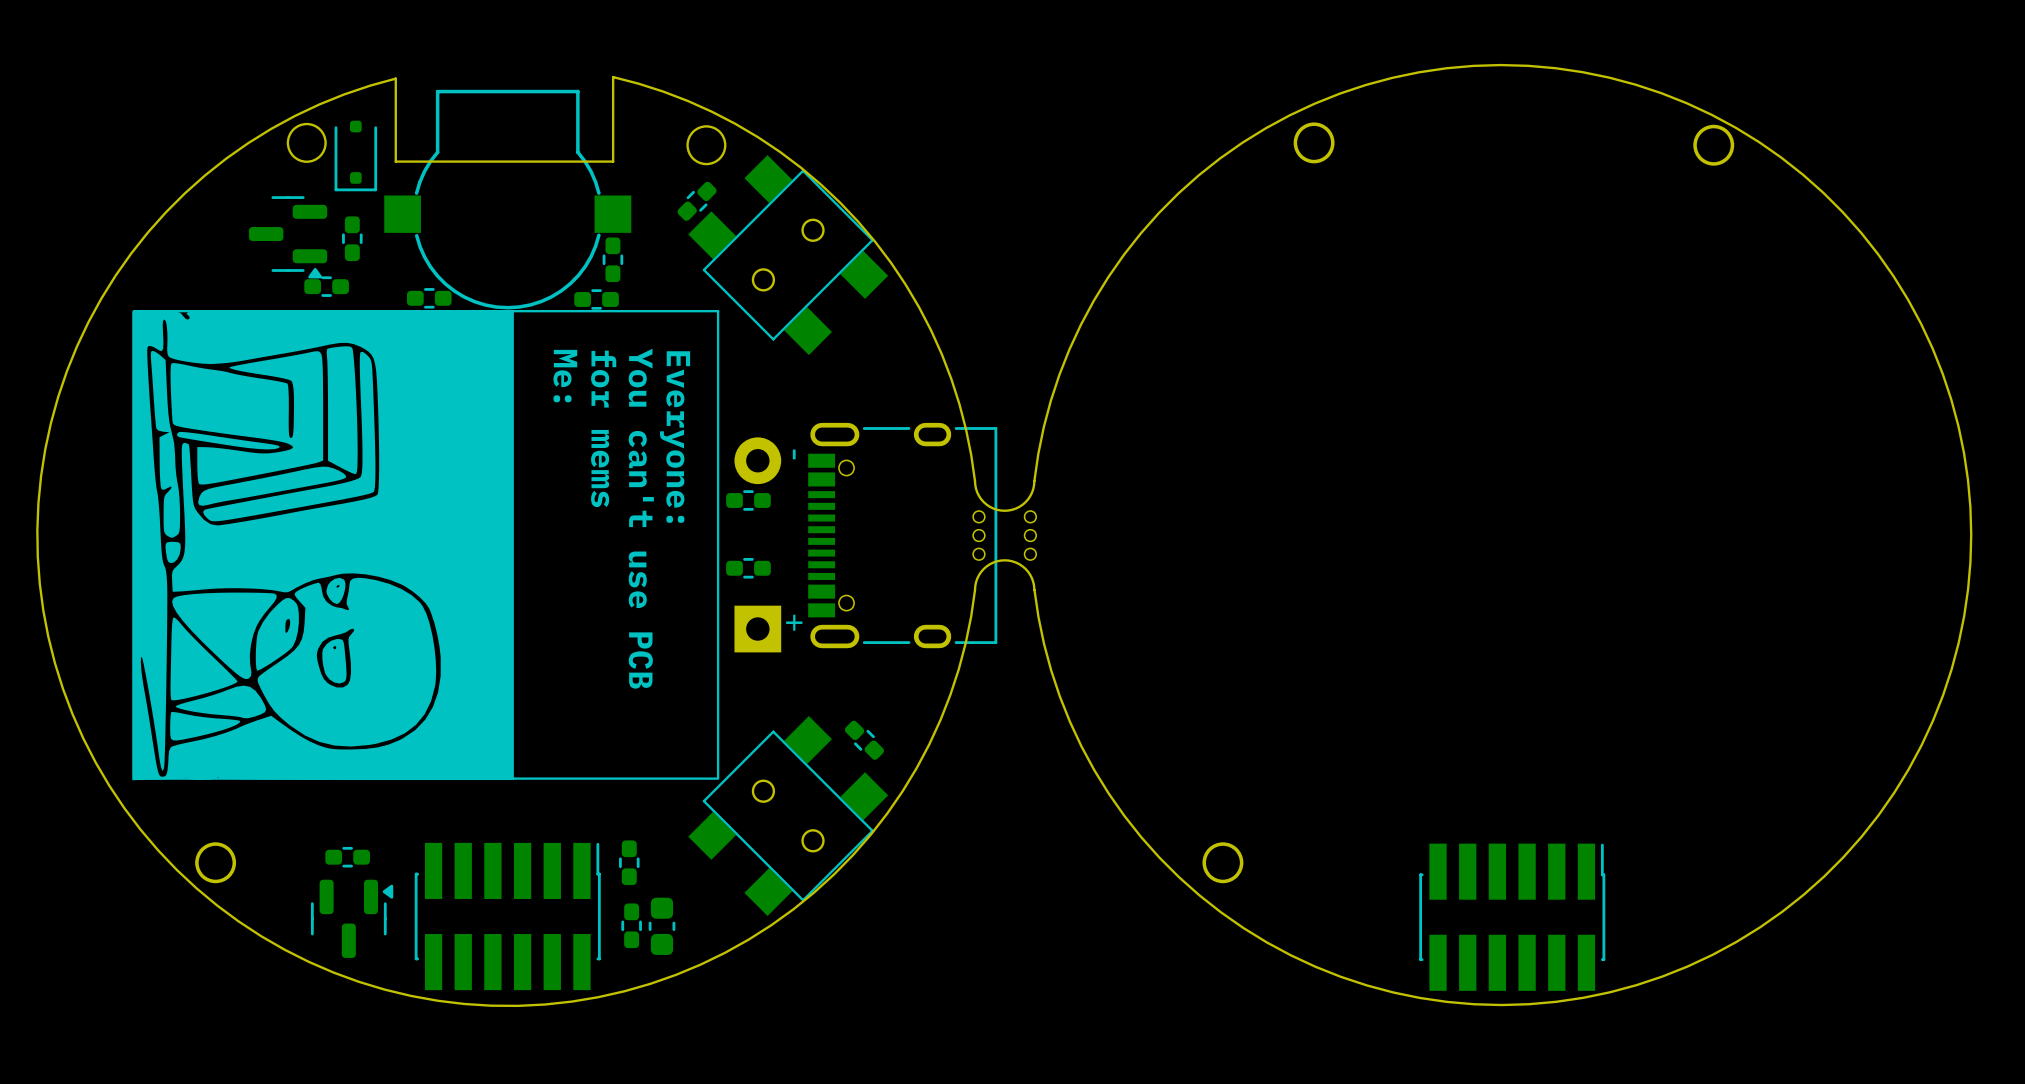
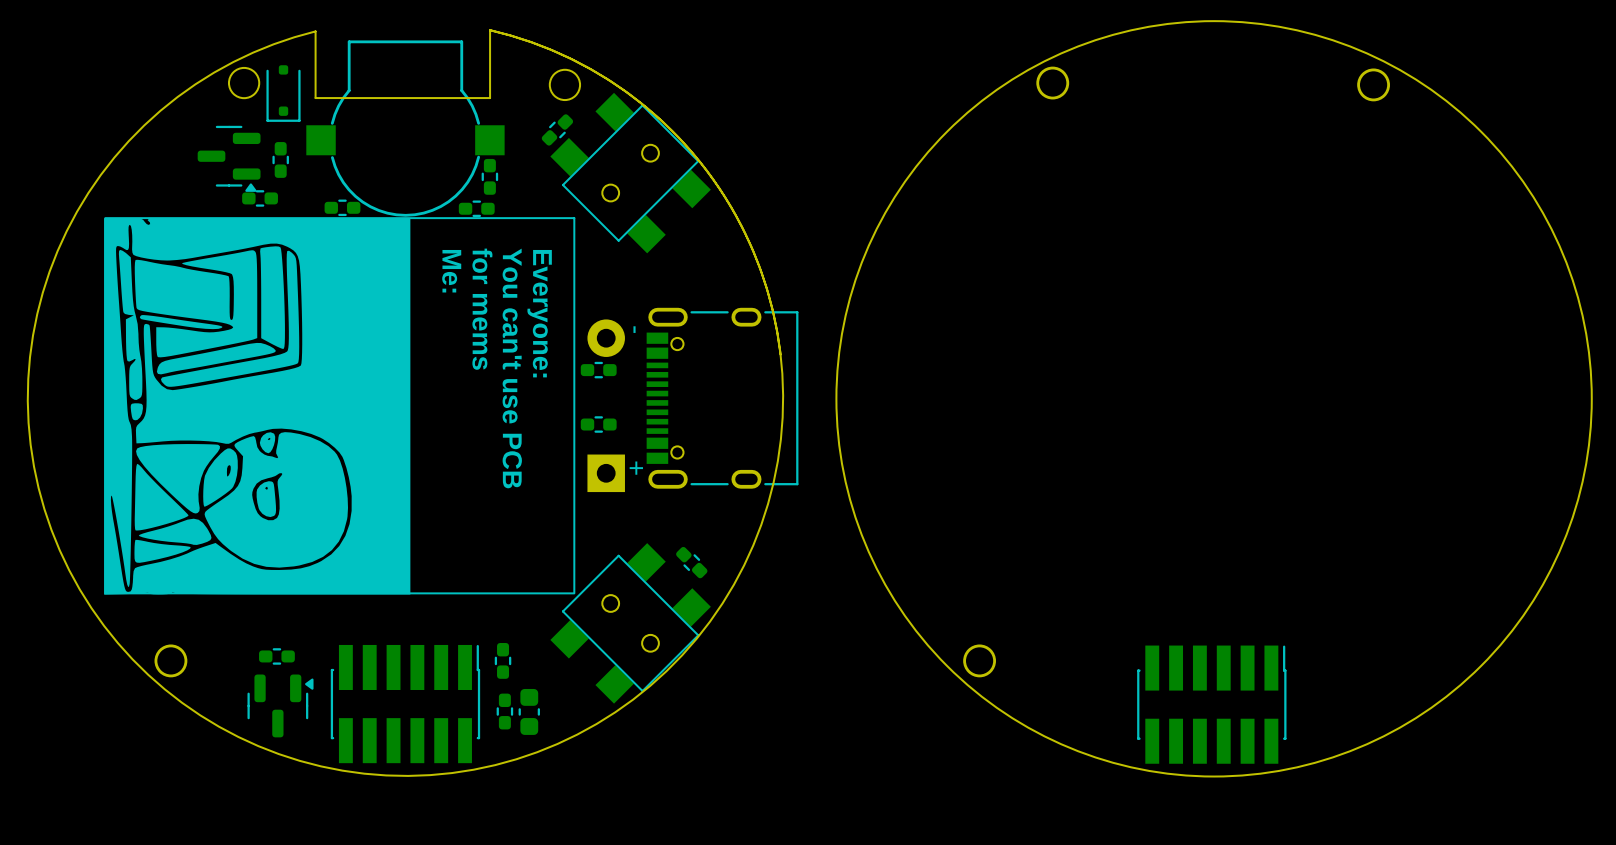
round board edge: none -> [835, 20, 1593, 778]
board edge: (395, 78) (344, 94) (294, 116) (271, 128) (226, 158) (205, 175) (165, 212) (131, 253) (101, 298) (76, 346) (58, 397) (50, 423) (41, 476) (37, 529) (37, 556) (43, 610) (48, 636) (62, 688) (83, 738) (95, 762) (124, 808) (158, 850) (196, 888) (238, 921) (284, 949) (333, 972) (358, 981) (410, 995) (464, 1003) (518, 1005) (544, 1004) (598, 997) (624, 991) (676, 974) (725, 952) (771, 925) (814, 892) (834, 874) (870, 834) (902, 791) (916, 768) (940, 719) (958, 669) (965, 643) (975, 590) -> (315, 31) (253, 52) (195, 84) (144, 125) (100, 174) (66, 231) (49, 271) (37, 313) (28, 379) (30, 444) (44, 509) (69, 570) (104, 625) (148, 674) (200, 715) (258, 746) (299, 760) (342, 770) (408, 775) (473, 769) (516, 759) (557, 743) (615, 712) (666, 671) (710, 621) (744, 565) (768, 504) (780, 439) (782, 373) (772, 308) (759, 266) (741, 226) (706, 170) (662, 121) (610, 81) (552, 50) (490, 30)
board edge: (1034, 481) (1043, 427) (1050, 400) (1059, 374) (1080, 324) (1108, 277) (1140, 233) (1178, 193) (1198, 175) (1220, 158) (1265, 128) (1314, 103) (1339, 93) (1365, 84) (1419, 72) (1473, 65) (1528, 65) (1582, 72) (1609, 77) (1635, 84) (1686, 103) (1711, 114) (1759, 142) (1802, 174) (1842, 212) (1877, 253) (1908, 299) (1921, 323) (1942, 373) (1958, 426) (1964, 452) (1967, 479) (1971, 534) (1968, 589) (1964, 616) (1958, 642) (1943, 695) (1921, 745) (1894, 792) (1861, 836) (1843, 857) (1803, 894) (1782, 911) (1759, 927) (1712, 954) (1687, 966) (1636, 985) (1583, 997) (1529, 1004) (1501, 1005) (1447, 1001) (1420, 997) (1366, 985) (1315, 966) (1266, 942) (1243, 927) (1199, 895) (1179, 877) (1141, 837) (1108, 793) (1081, 746) (1059, 696) (1051, 670) (1038, 617) (1034, 590) -> none
part: (1004, 535) -> none

